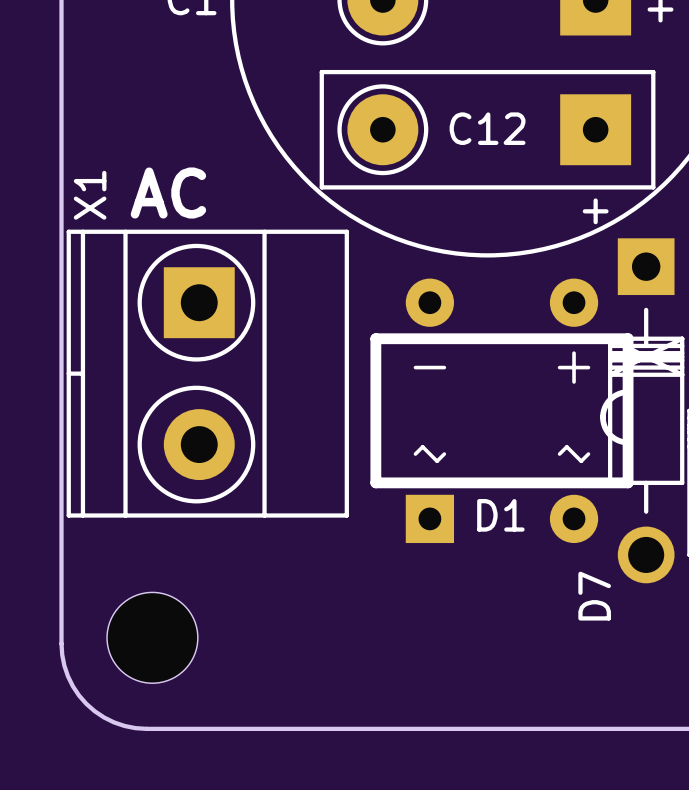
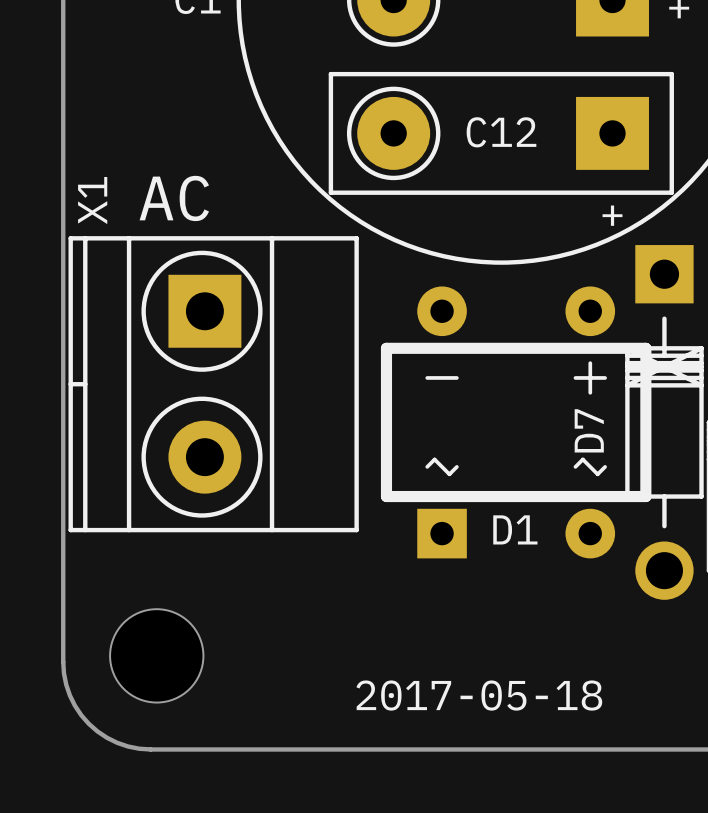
line: (628, 392) (618, 394) (610, 399) (604, 407) (602, 417) (604, 426) (610, 435) (618, 440) (628, 442) -> none
D7 name position: D7 (594, 596) -> D7 (589, 430)
text: none -> 2017-05-18 (479, 695)

